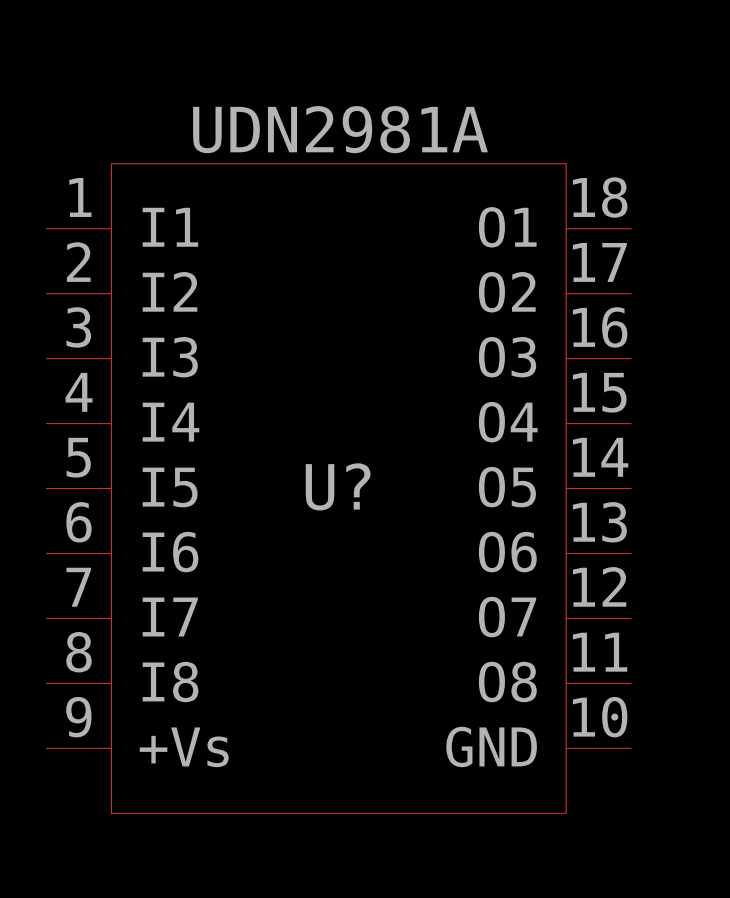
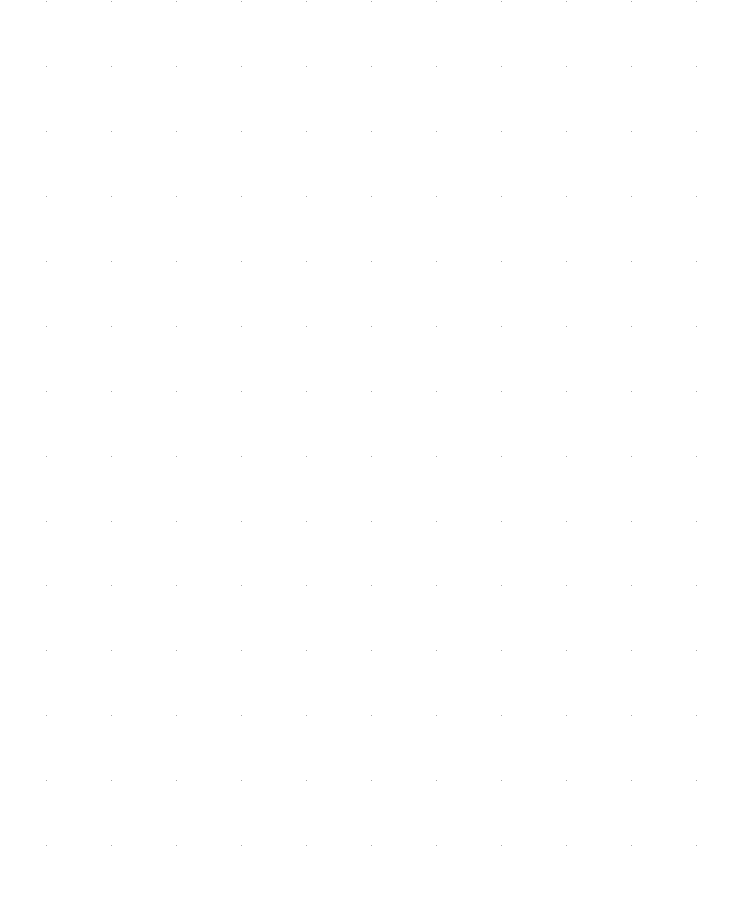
U?: UDN2981A (338, 488) -> none

